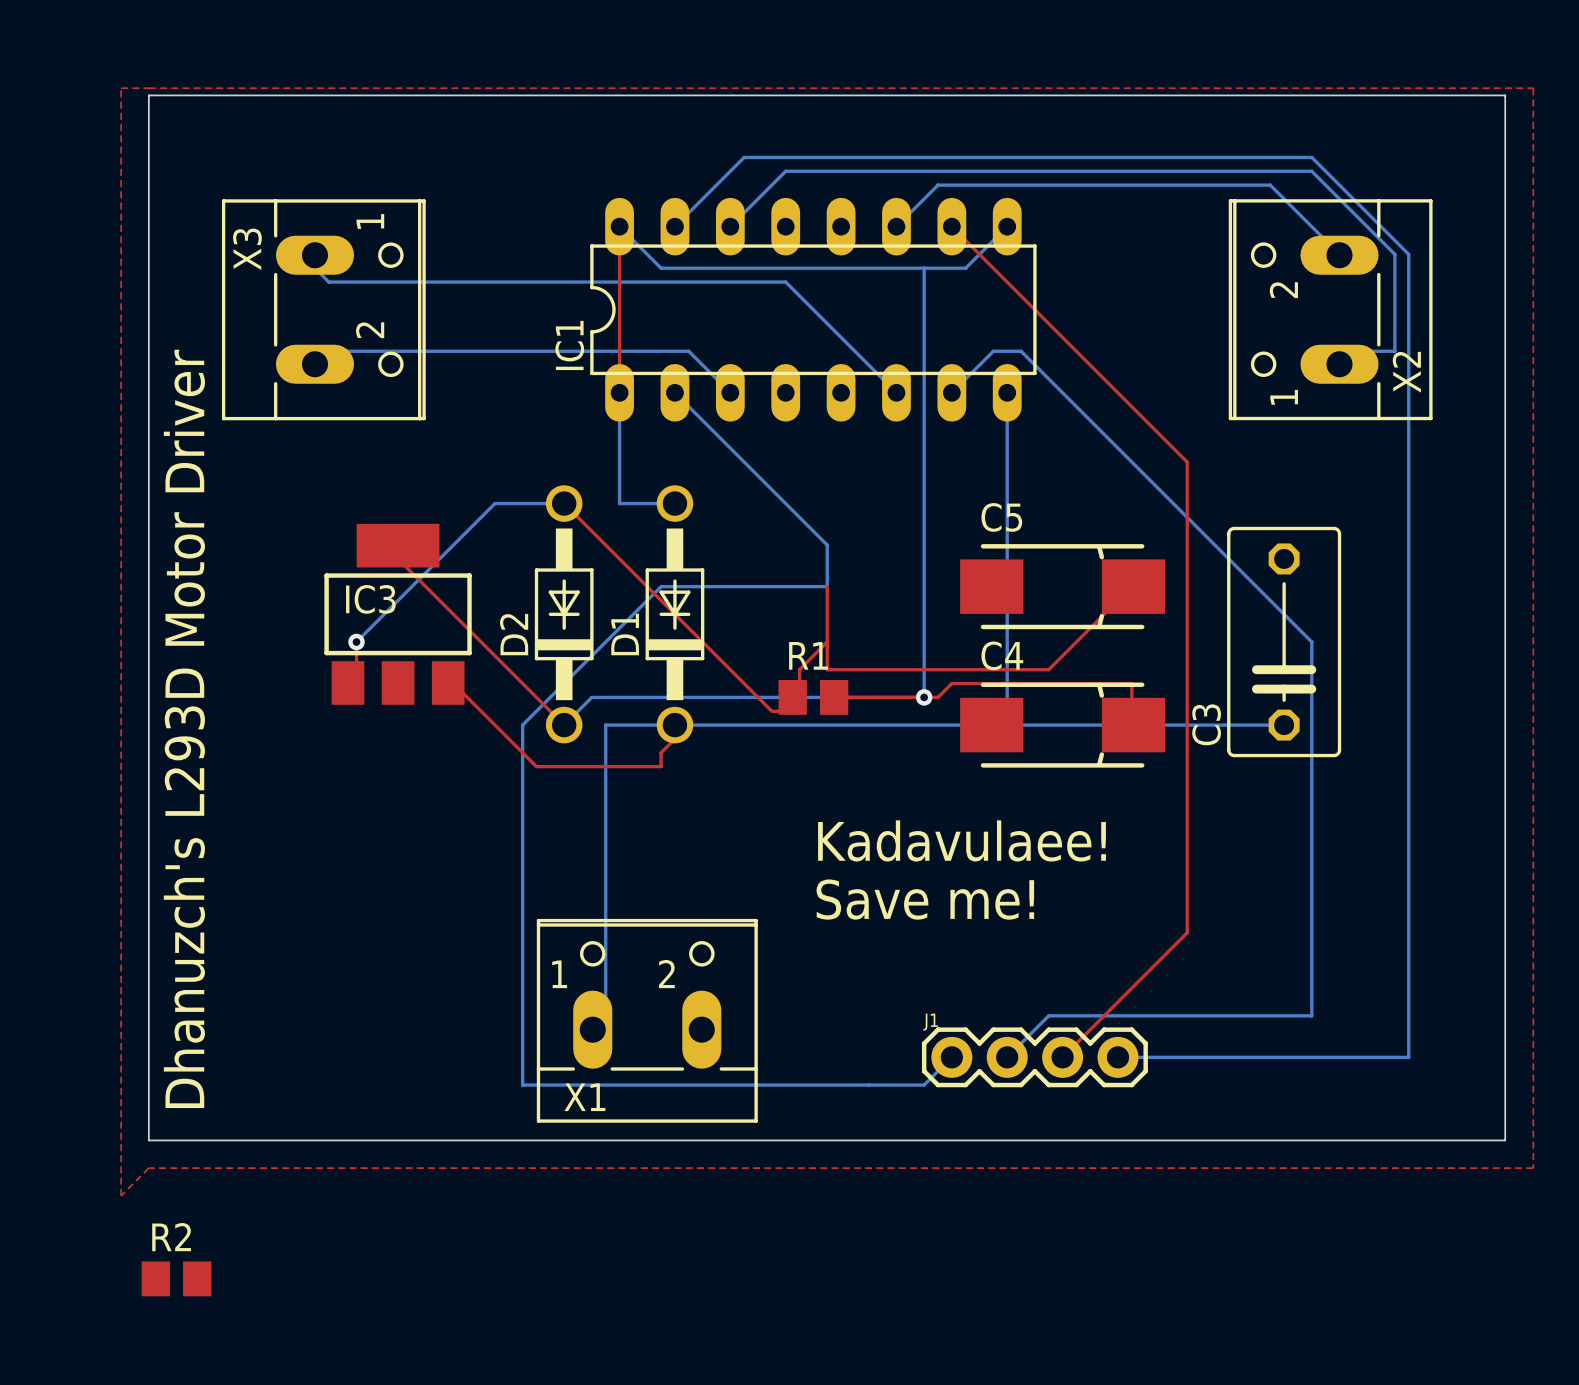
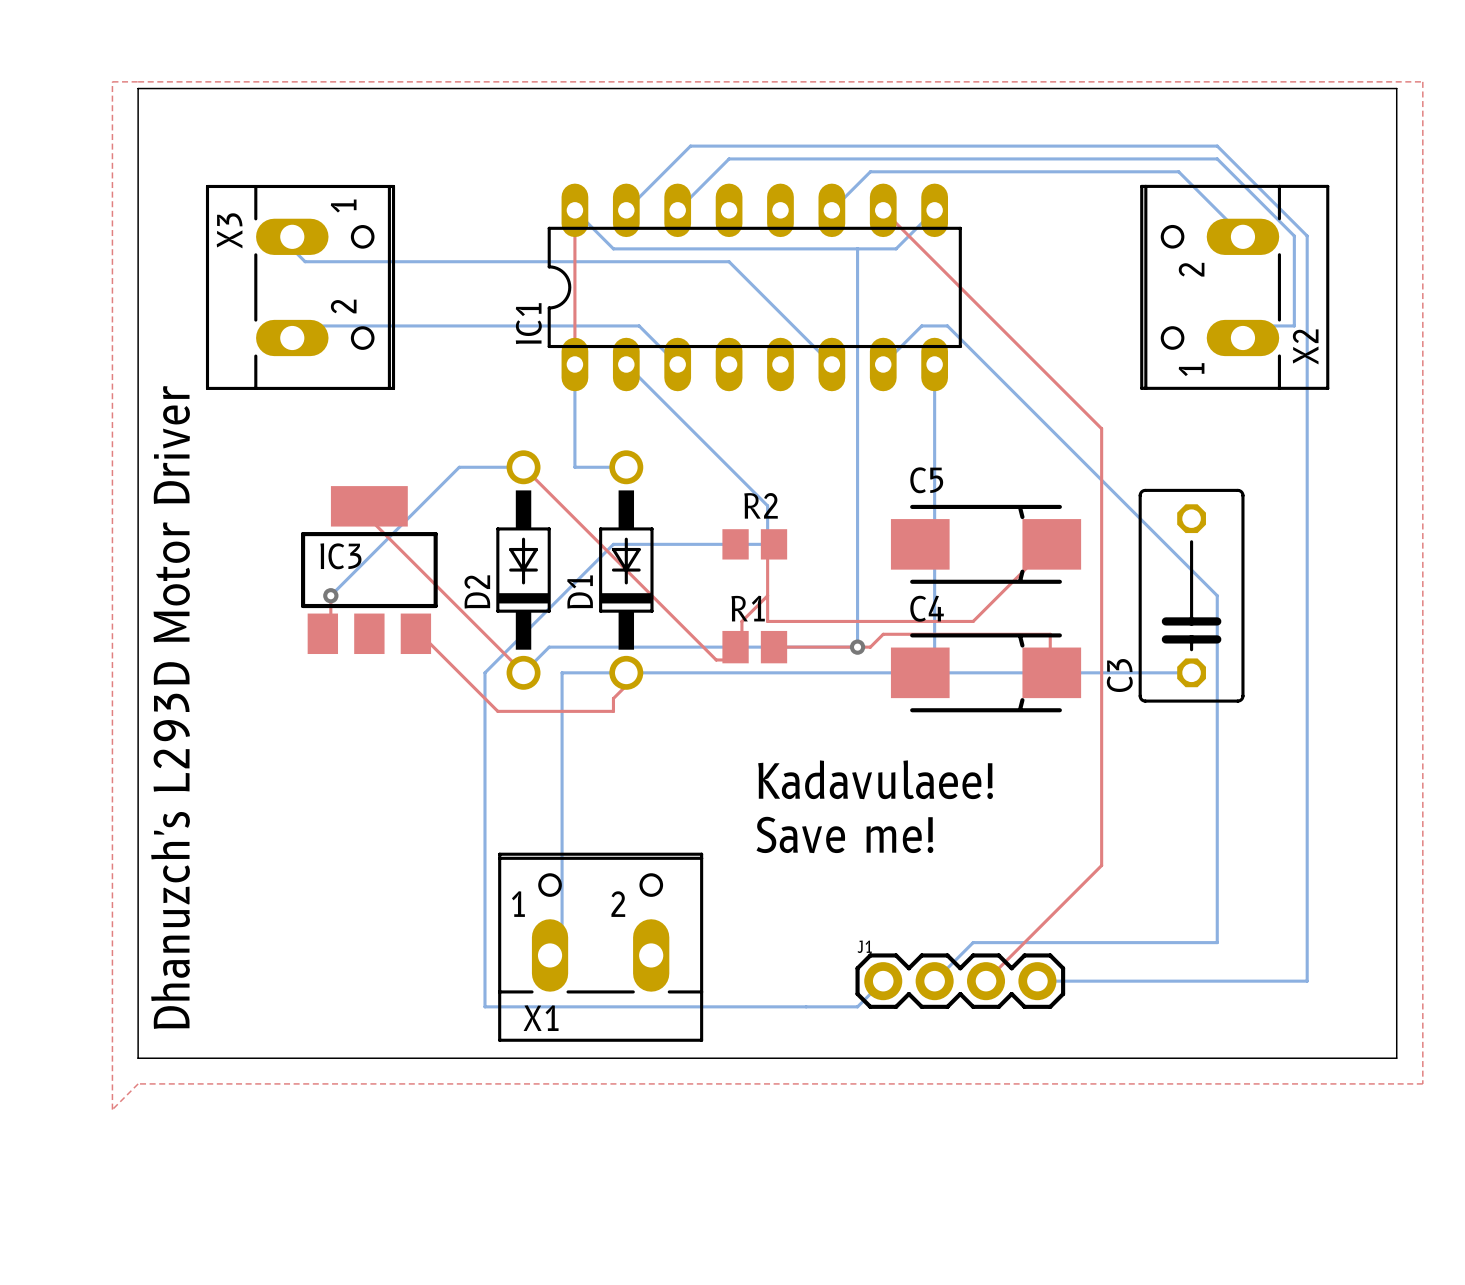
R2 footprint: [141, 1261, 212, 1297] -> [722, 529, 788, 560]

